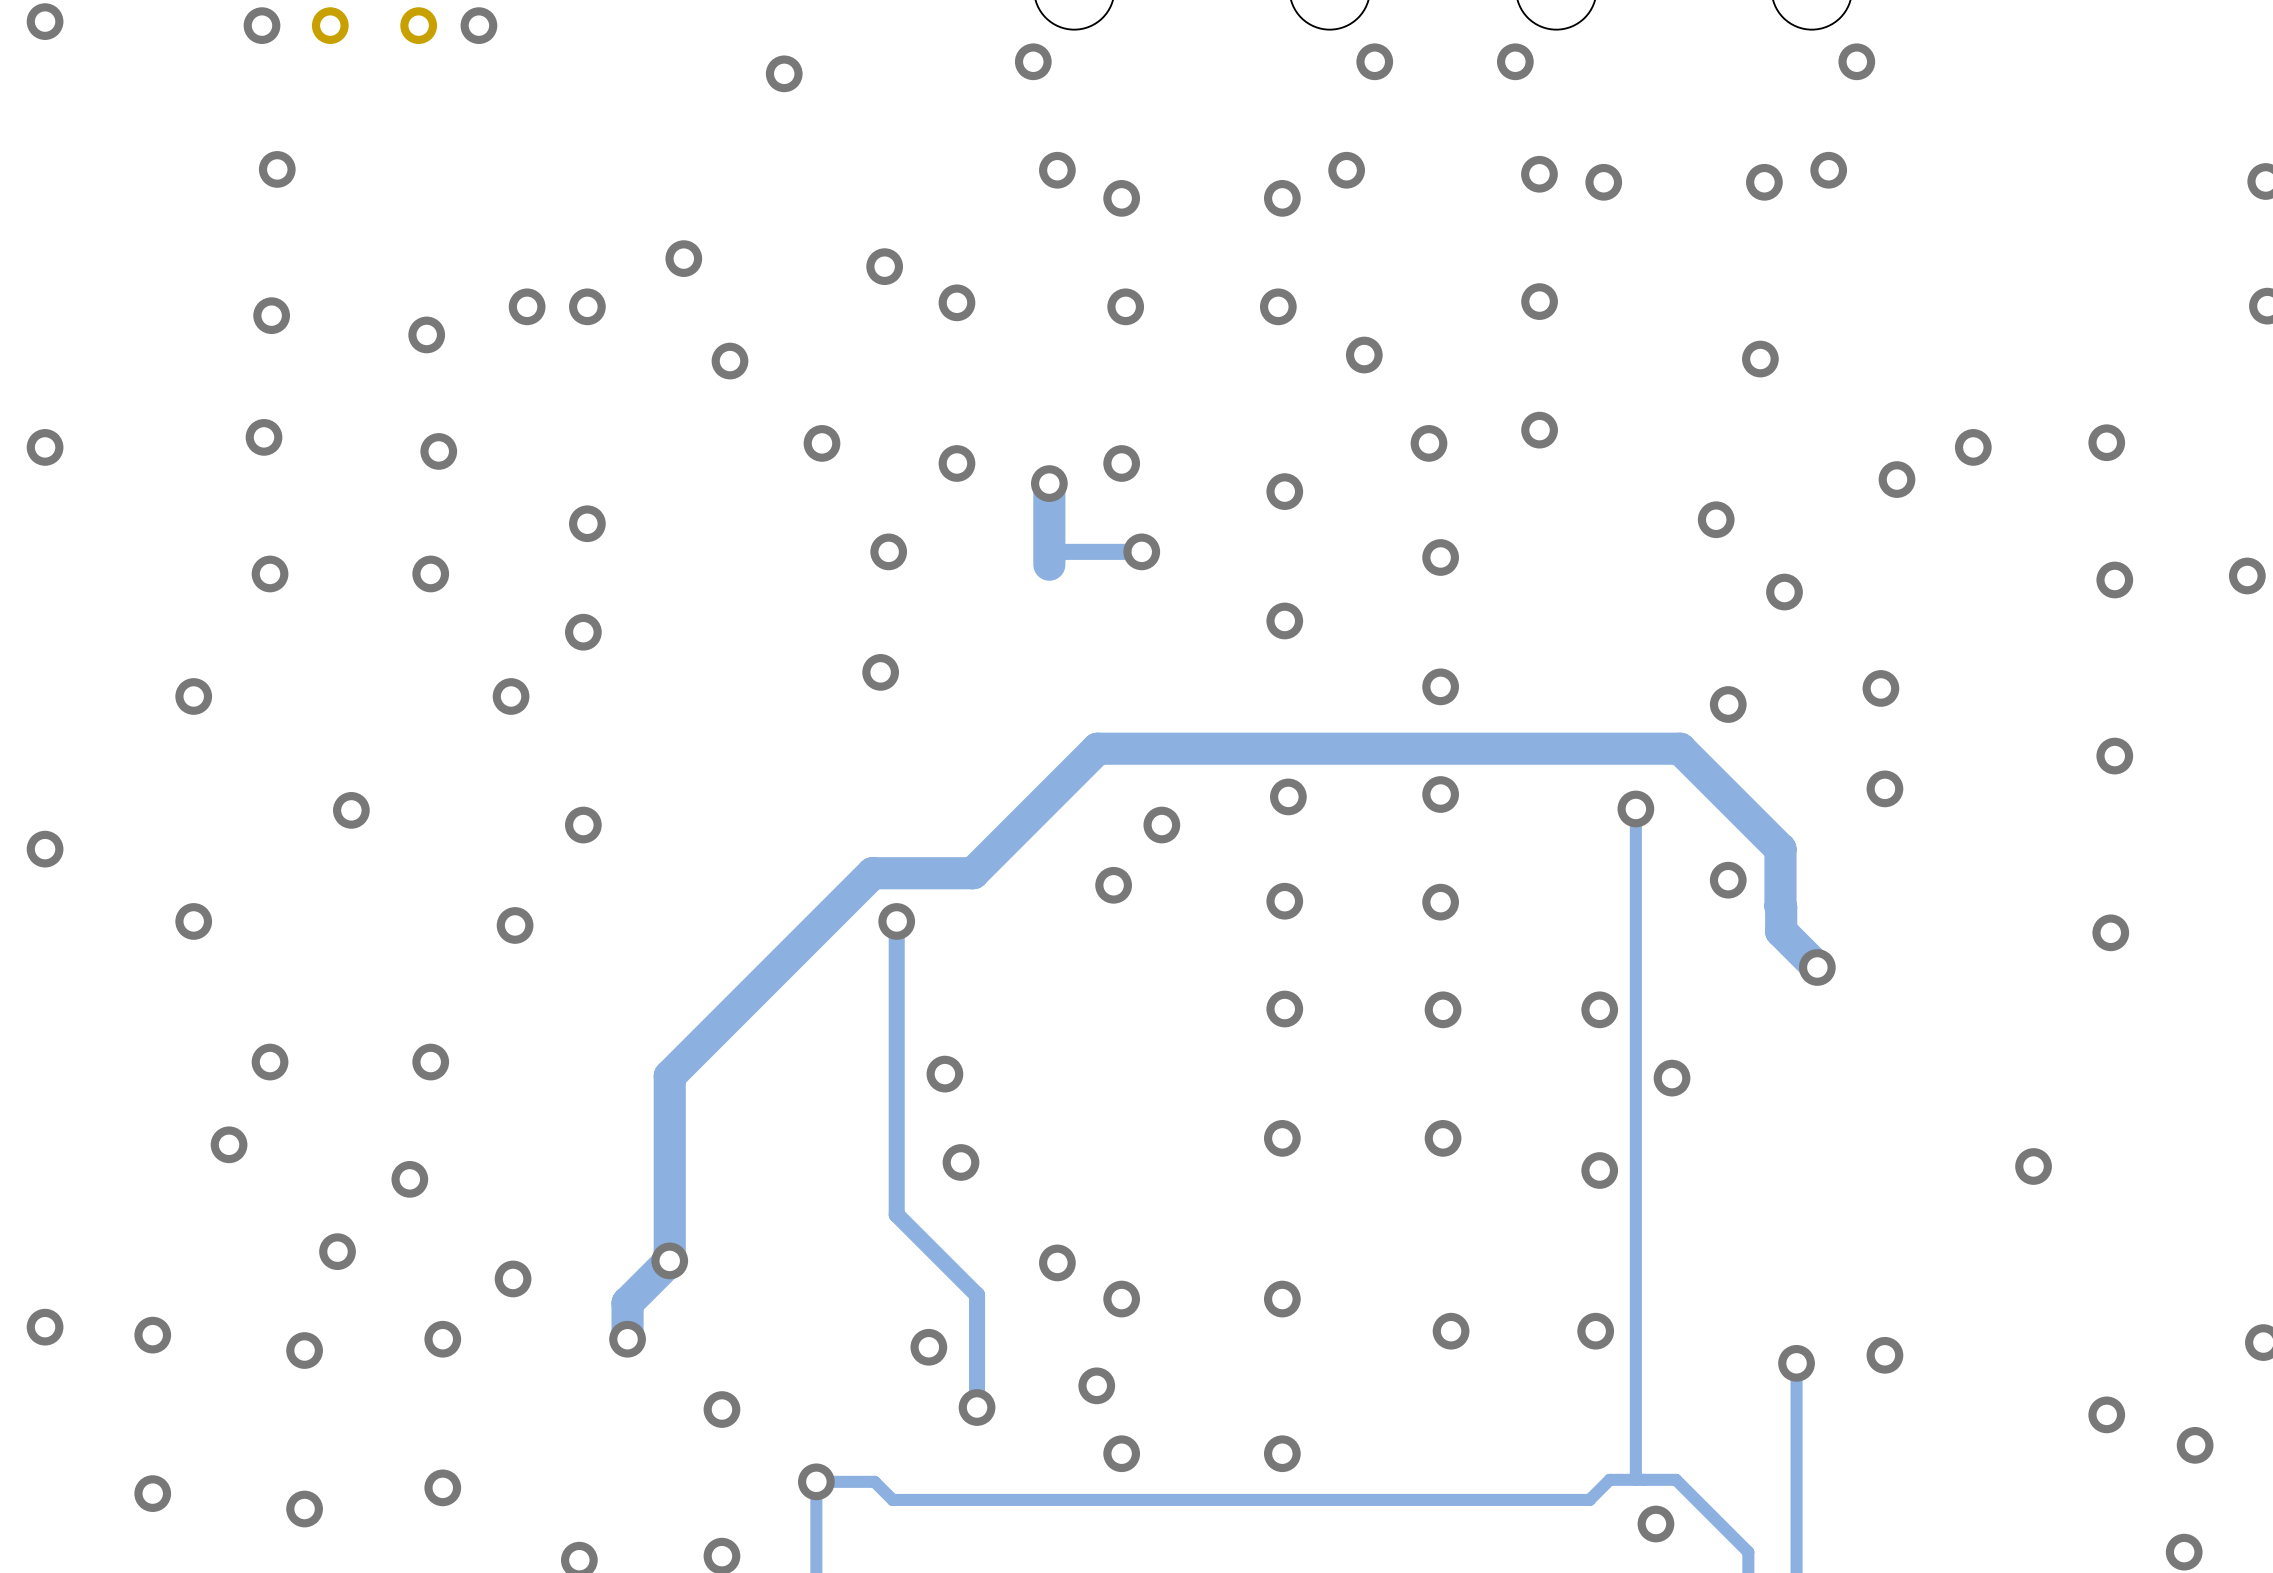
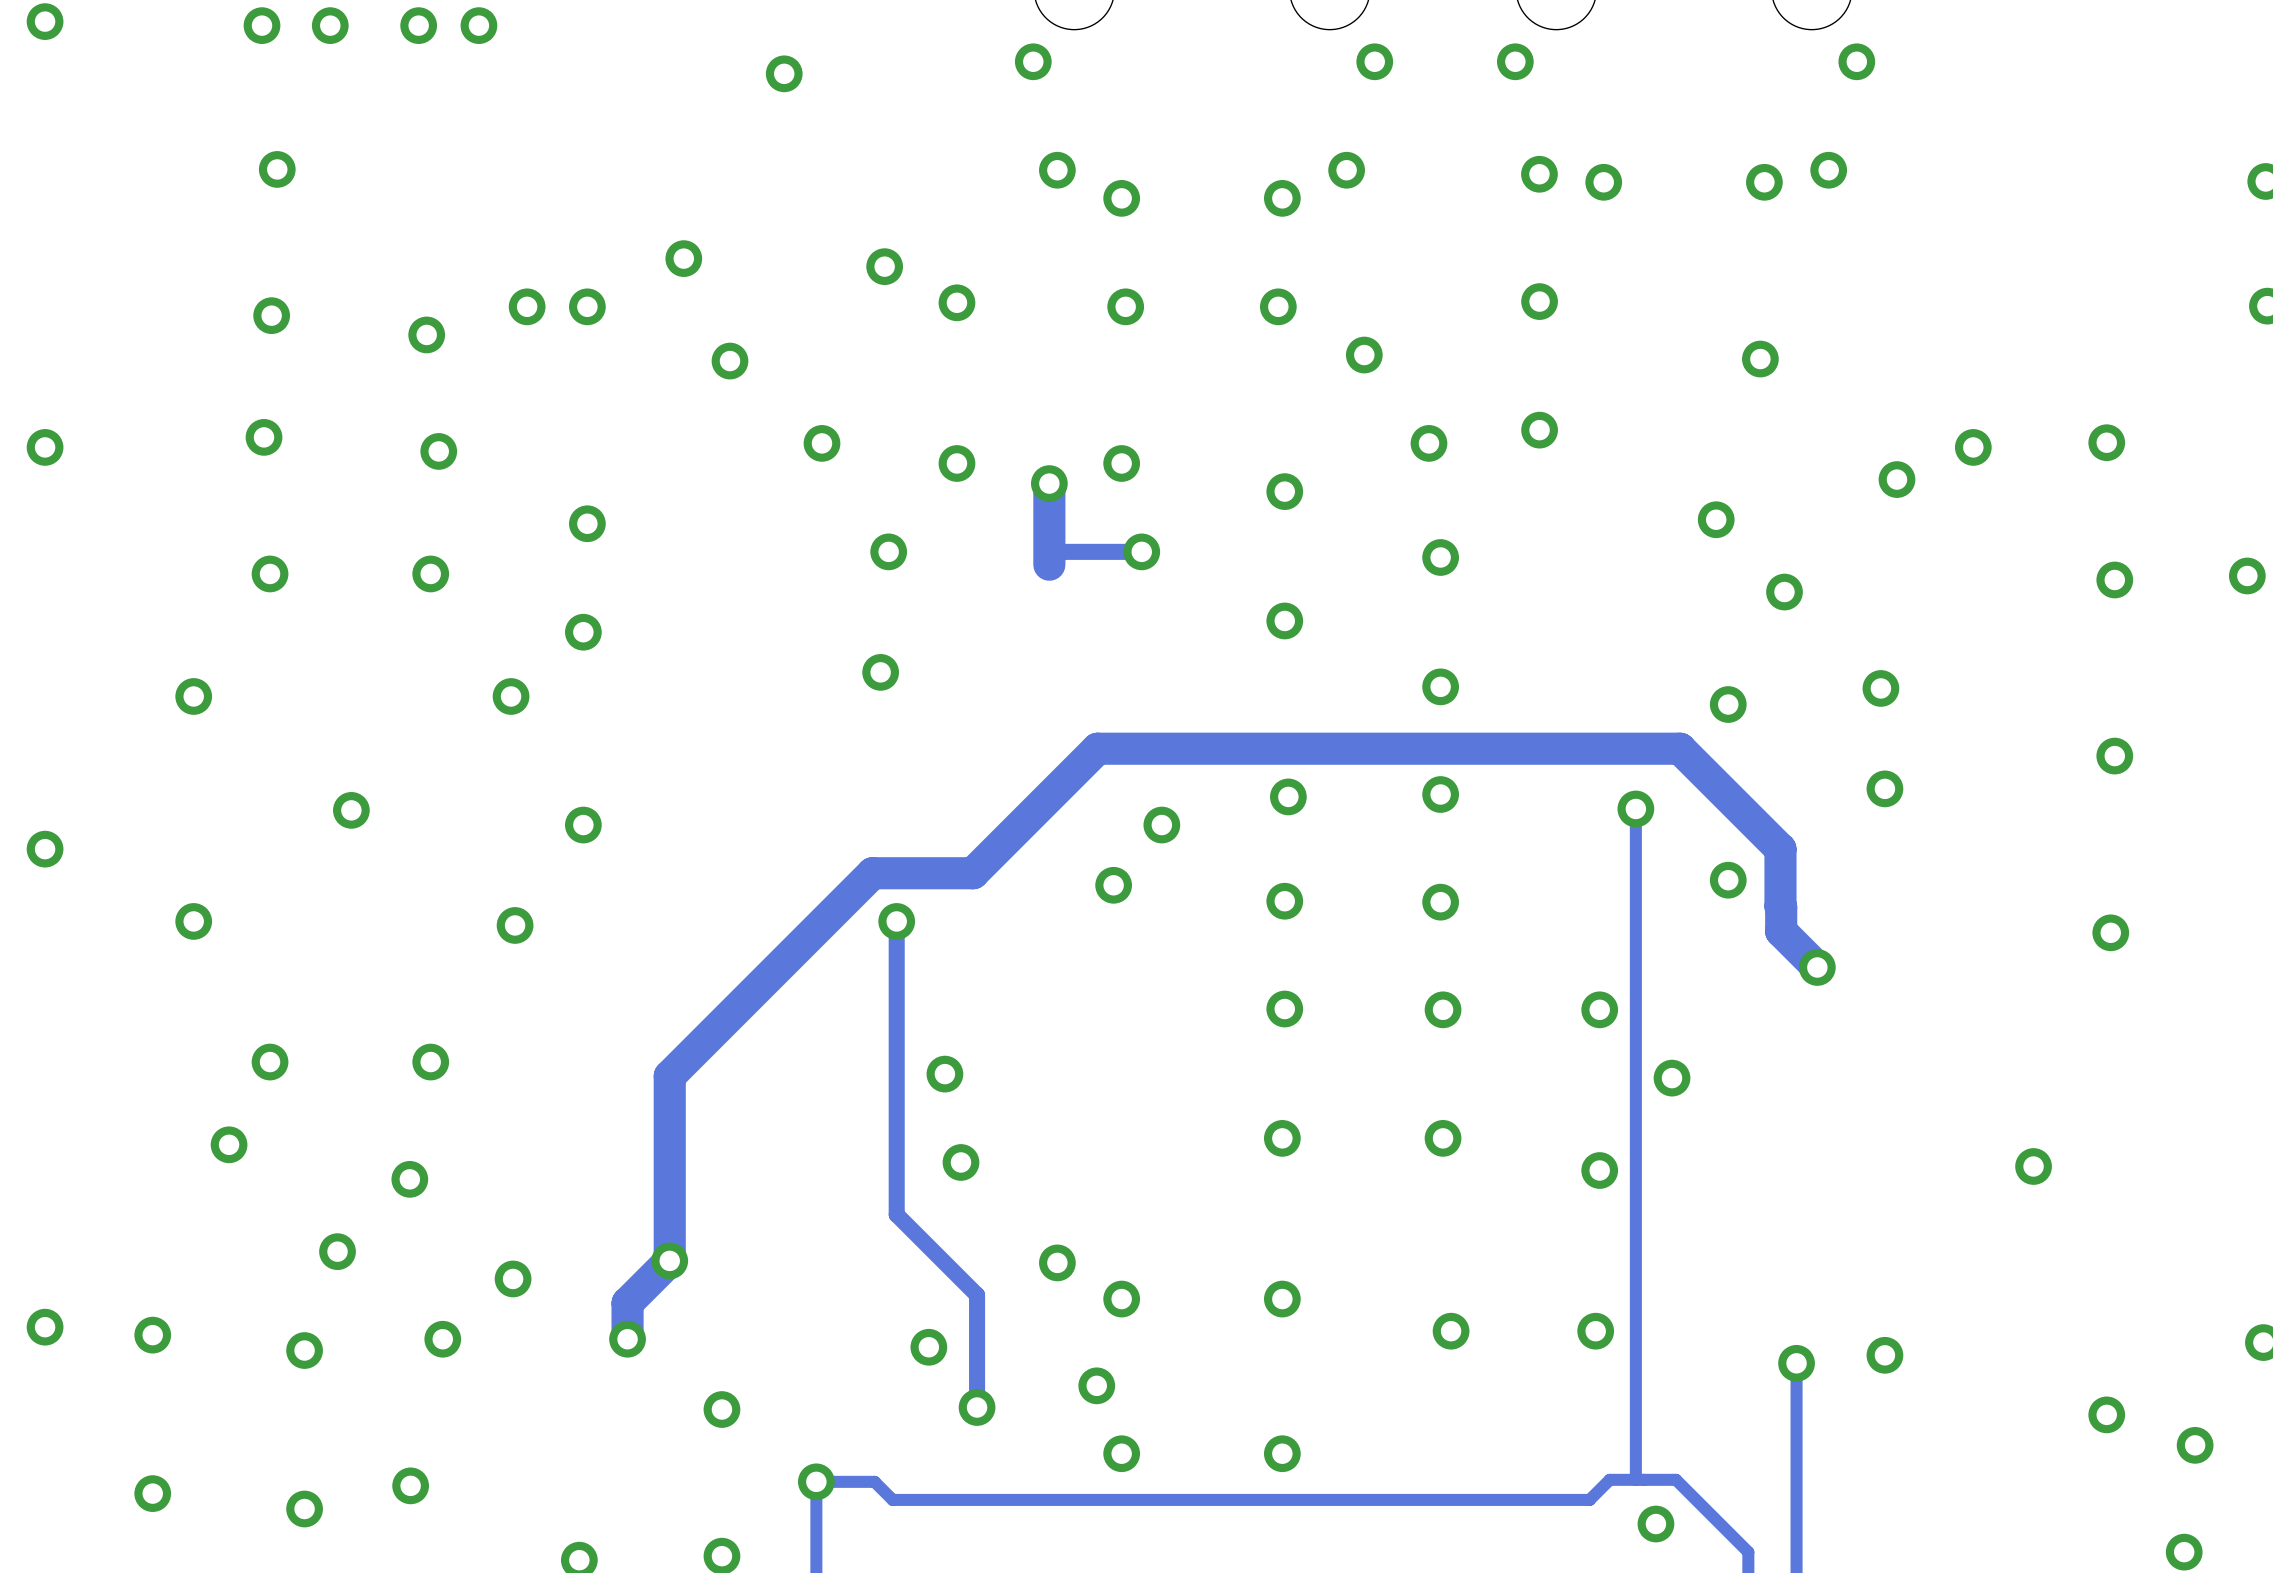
via position: (442, 1487) -> (410, 1485)

